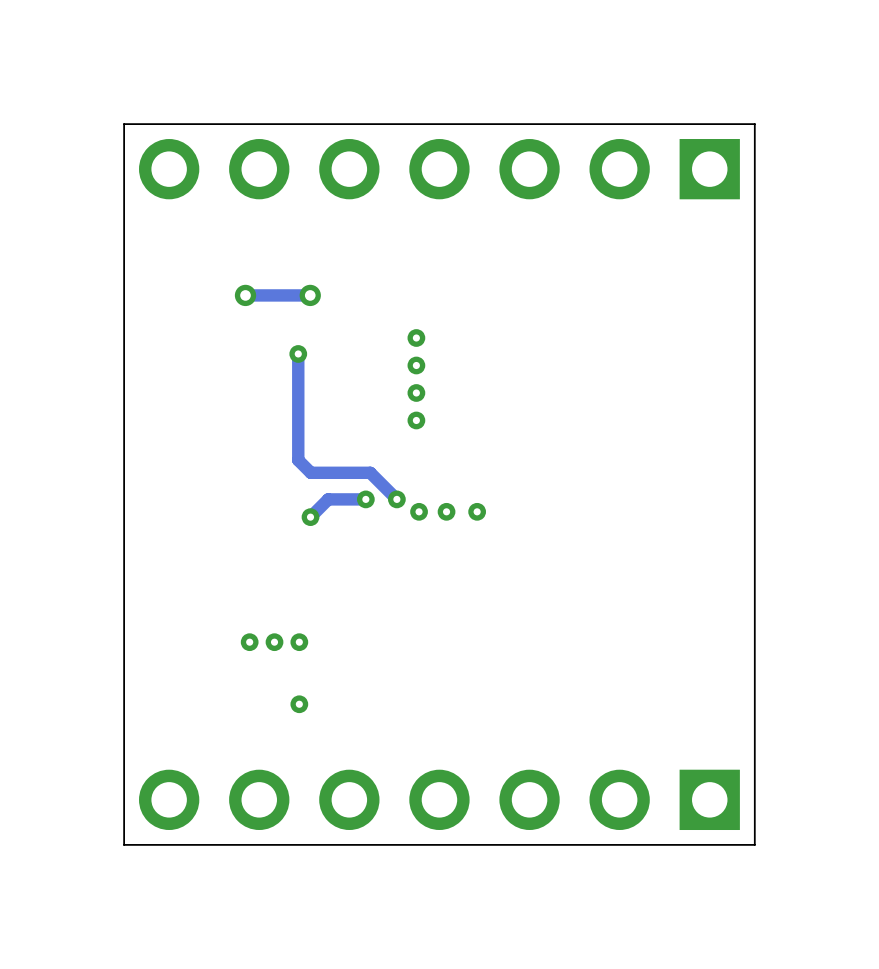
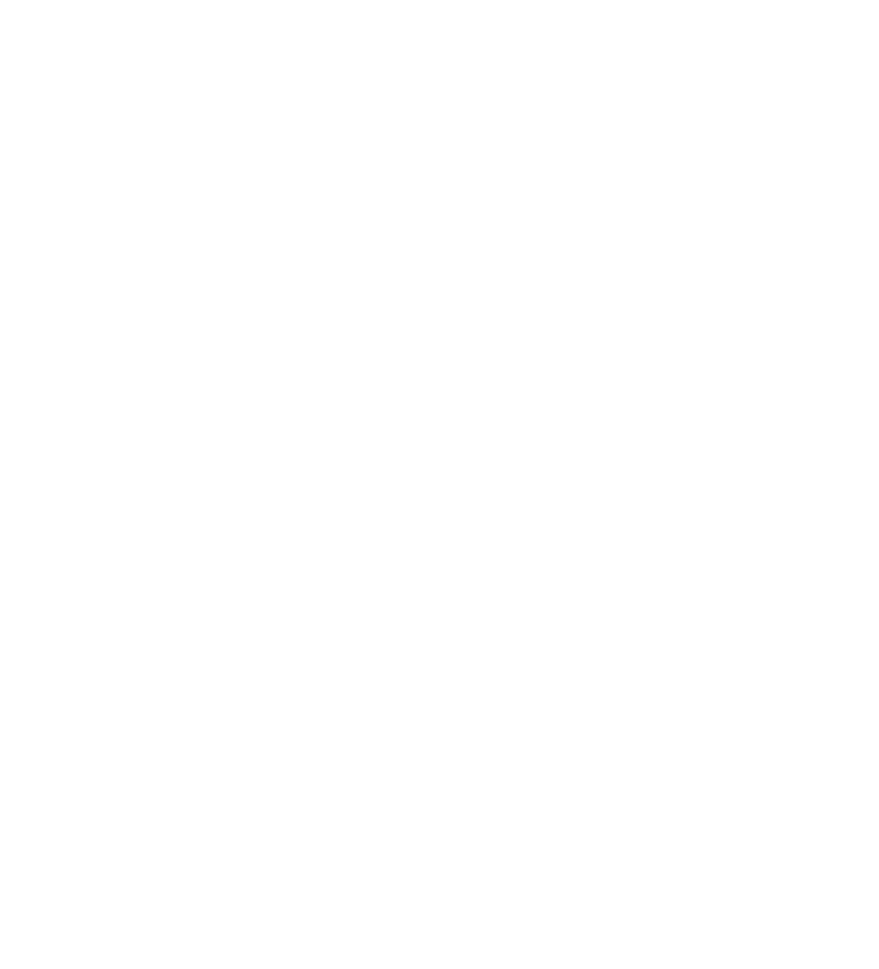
board edge: (754, 124) (124, 124) (124, 844) (754, 844) (754, 124) -> none
part: (439, 169) -> none
via: (245, 295) -> none
track: (310, 295) (245, 295) -> none
via: (310, 295) -> none
via: (416, 338) -> none
track: (298, 353) (298, 460) (310, 472) (370, 472) (396, 499) -> none
via: (298, 353) -> none
via: (416, 365) -> none
via: (416, 392) -> none
via: (416, 420) -> none
track: (365, 499) (328, 499) (310, 517) -> none
via: (365, 499) -> none
via: (396, 499) -> none
via: (419, 511) -> none
via: (446, 511) -> none
via: (477, 511) -> none
via: (310, 517) -> none
via: (249, 642) -> none
via: (274, 642) -> none
via: (299, 642) -> none
via: (299, 704) -> none
part: (439, 799) -> none

